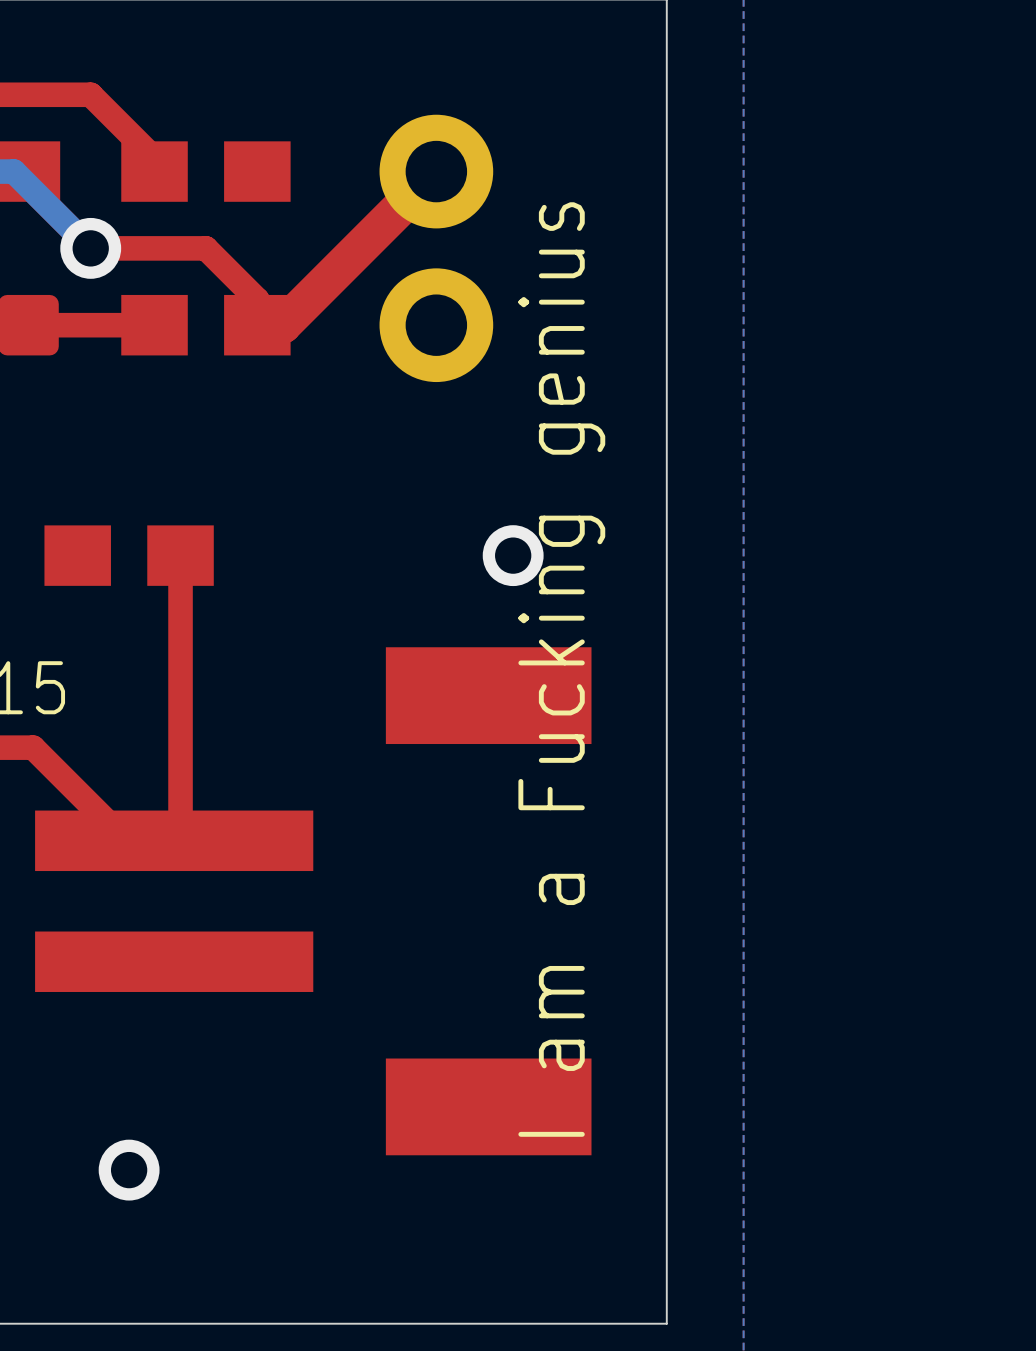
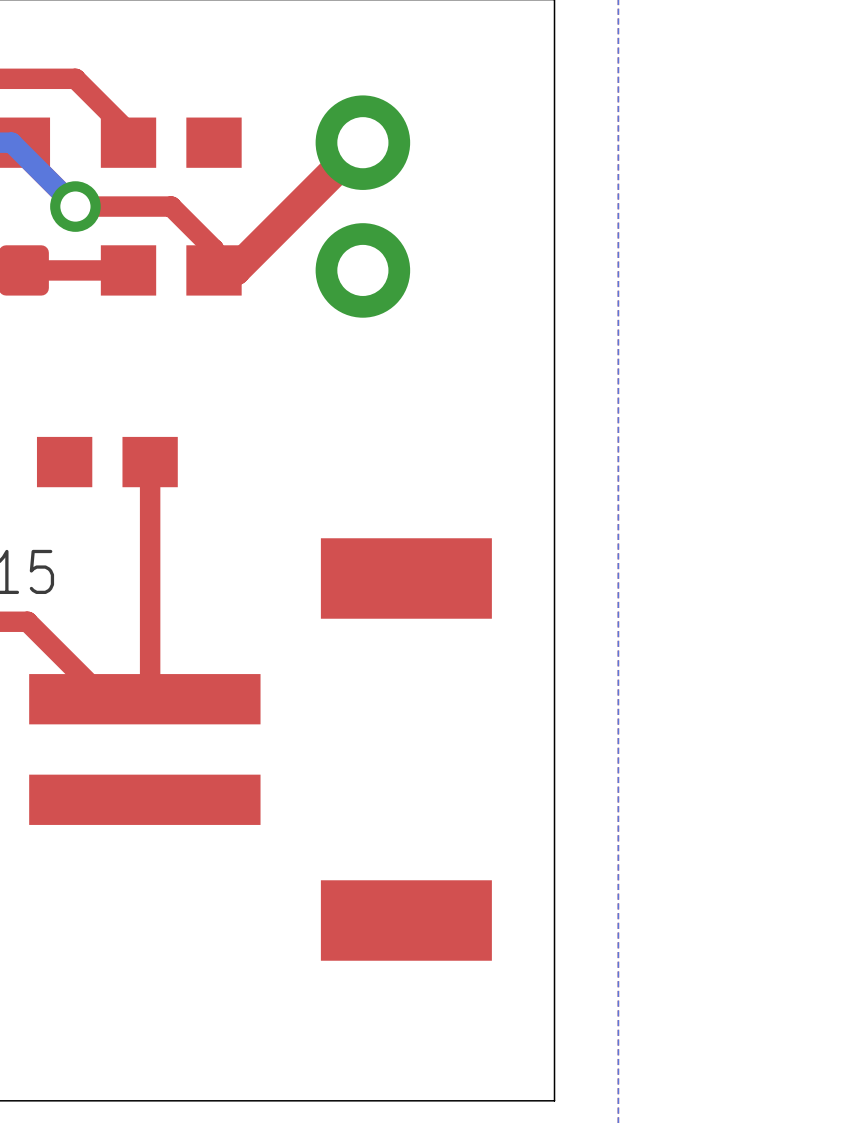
via: (513, 555) -> none
text: I am a Fucking genius (561, 669) -> none
via: (129, 1170) -> none

